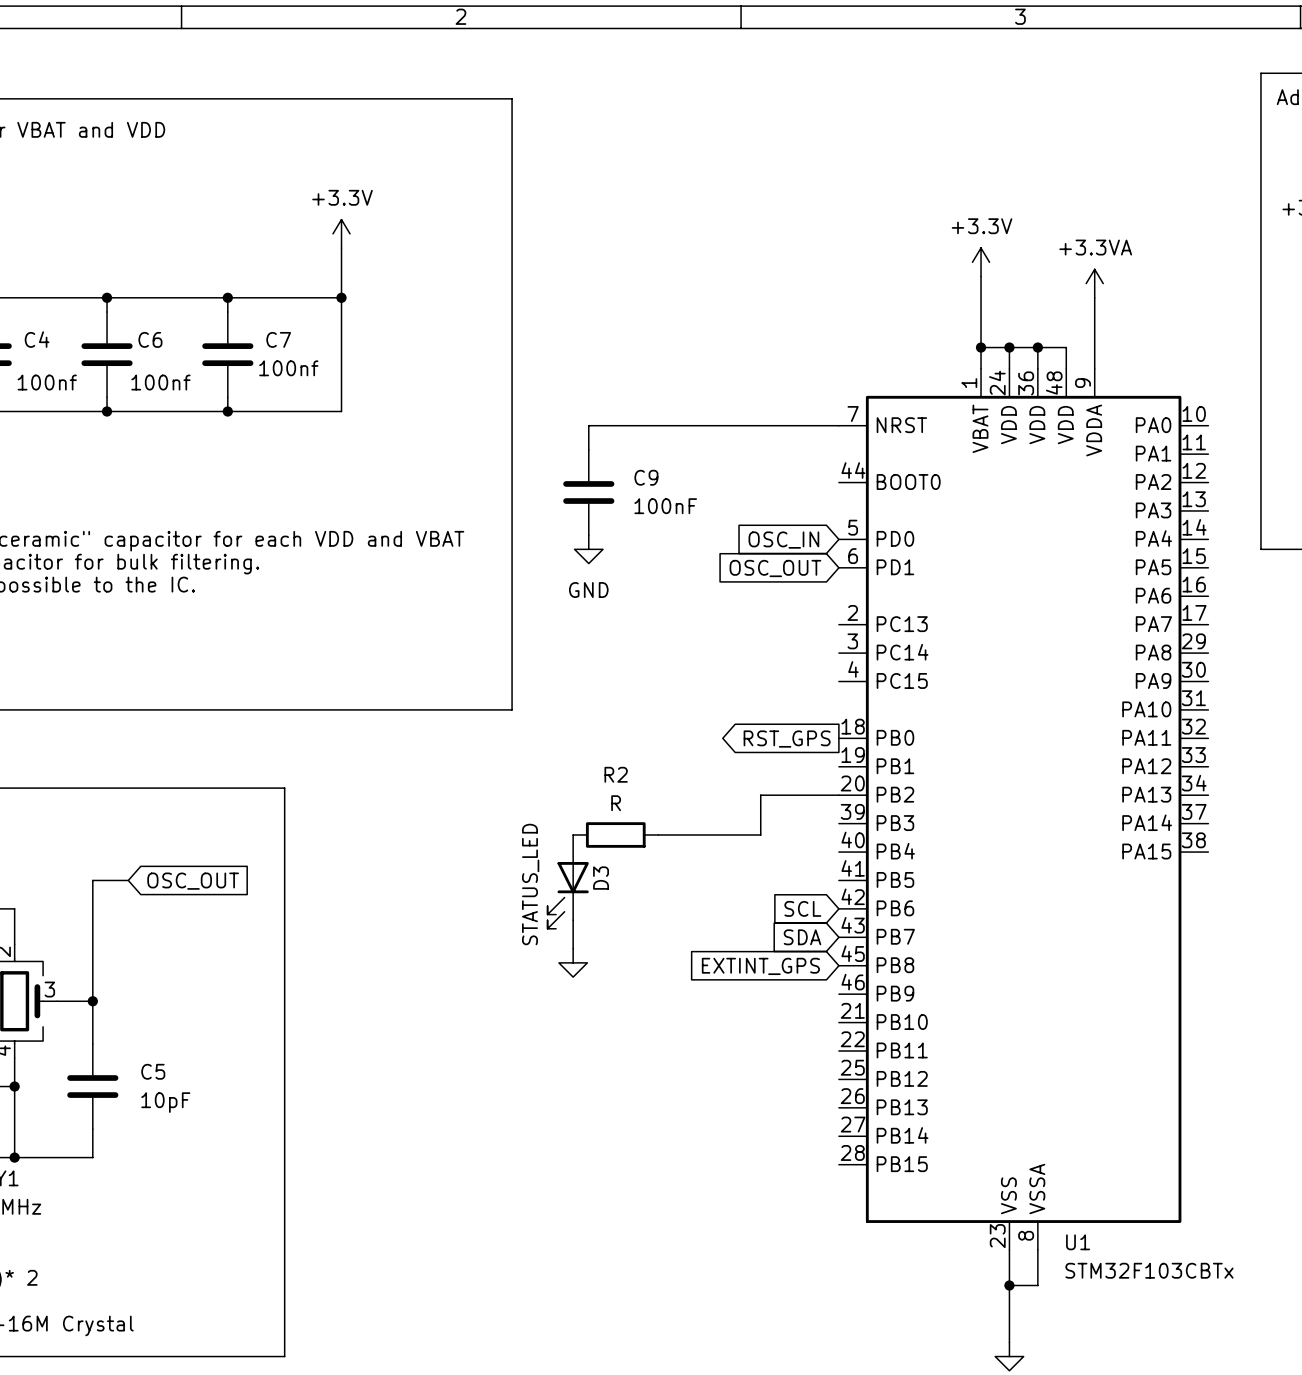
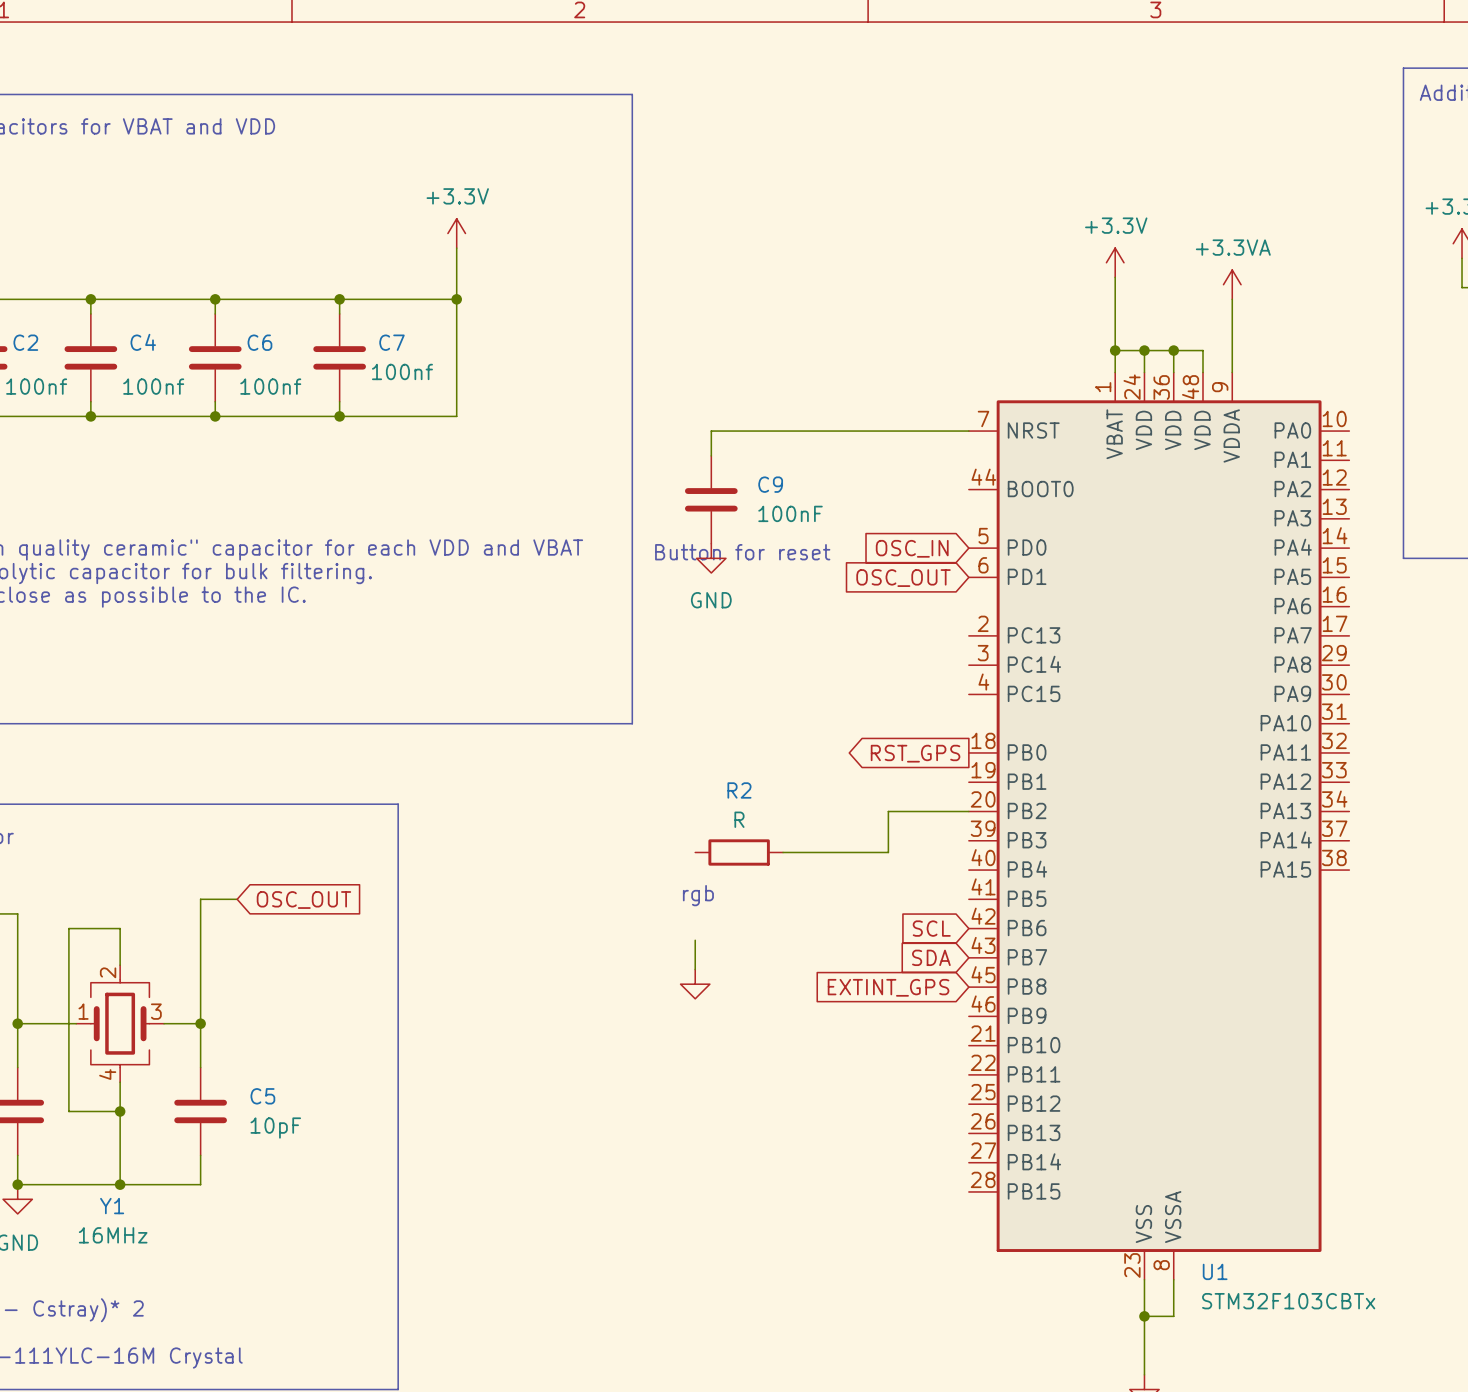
text: none -> Button for reset (742, 552)
text: none -> rgb (698, 895)
D3: STATUS_LED (568, 881) -> none

